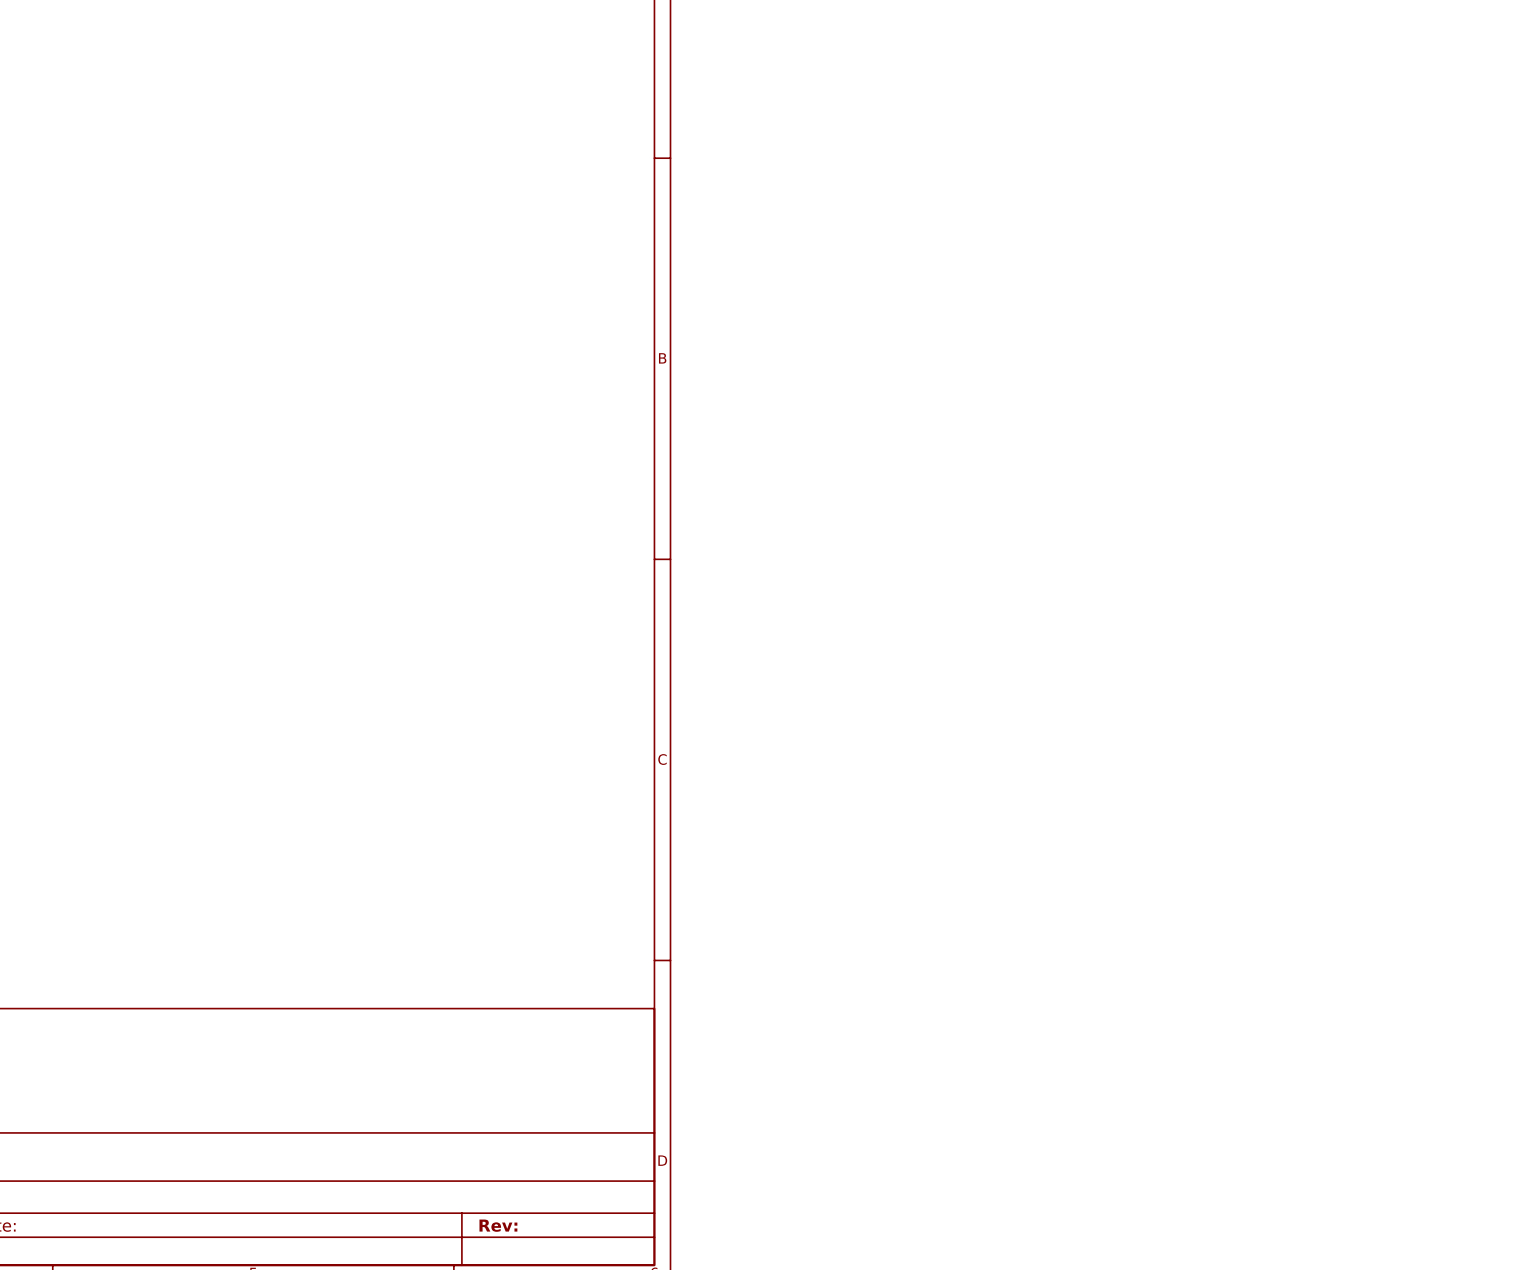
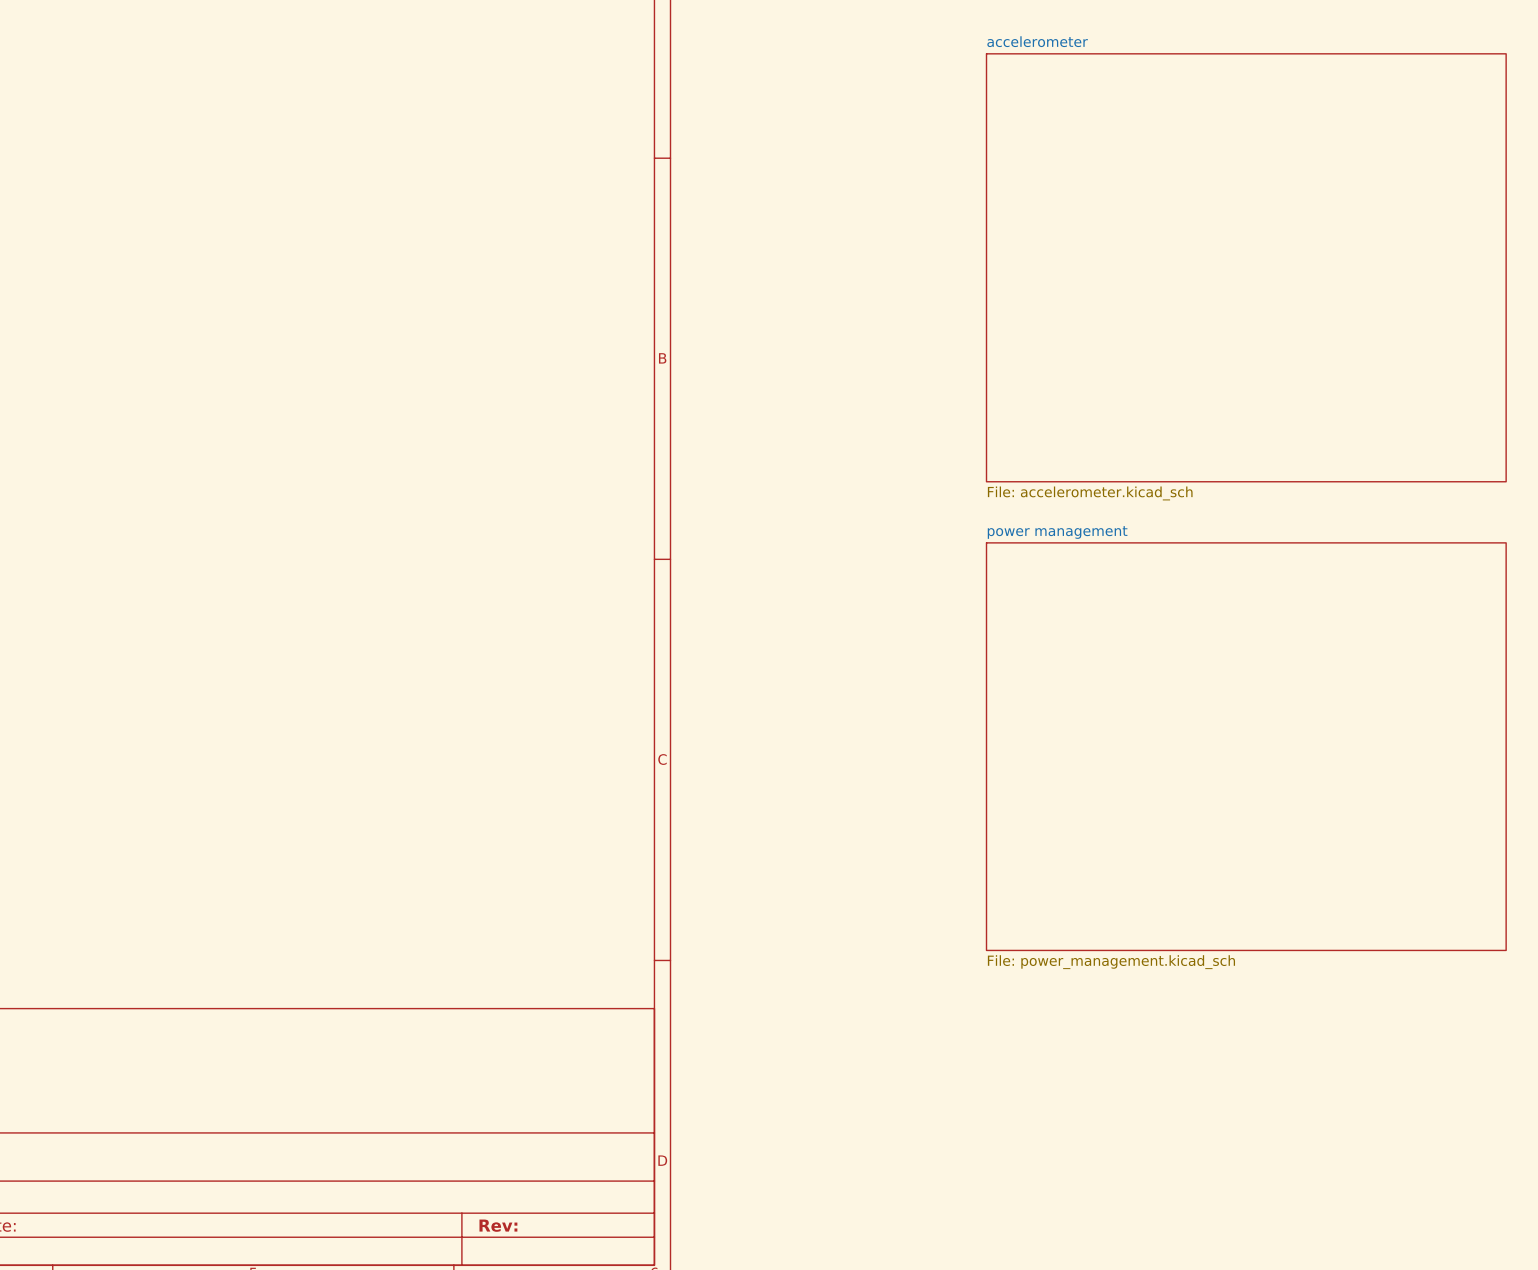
sheet accelerometer: none -> File: accelerometer.kicad_sch (1246, 267)
sheet power management: none -> File: power_management.kicad_sch (1246, 746)

